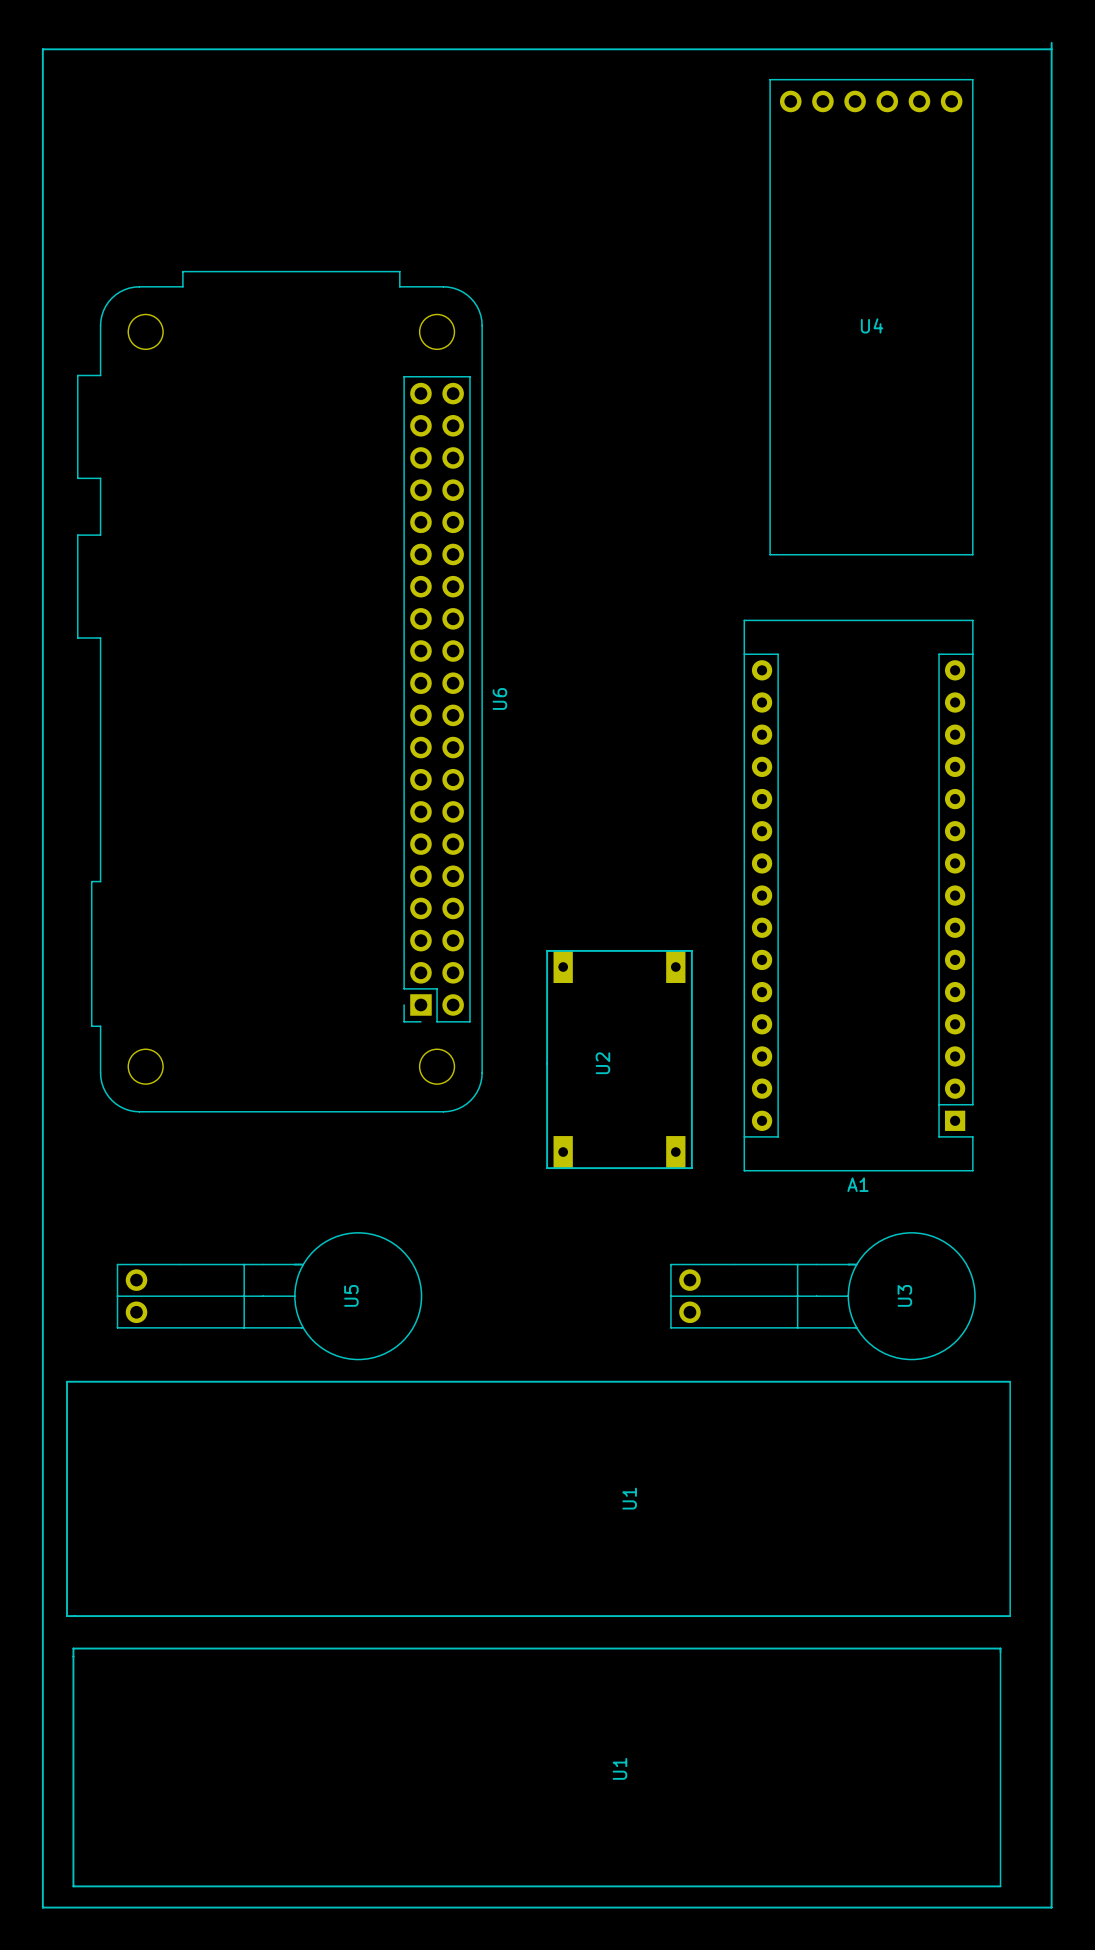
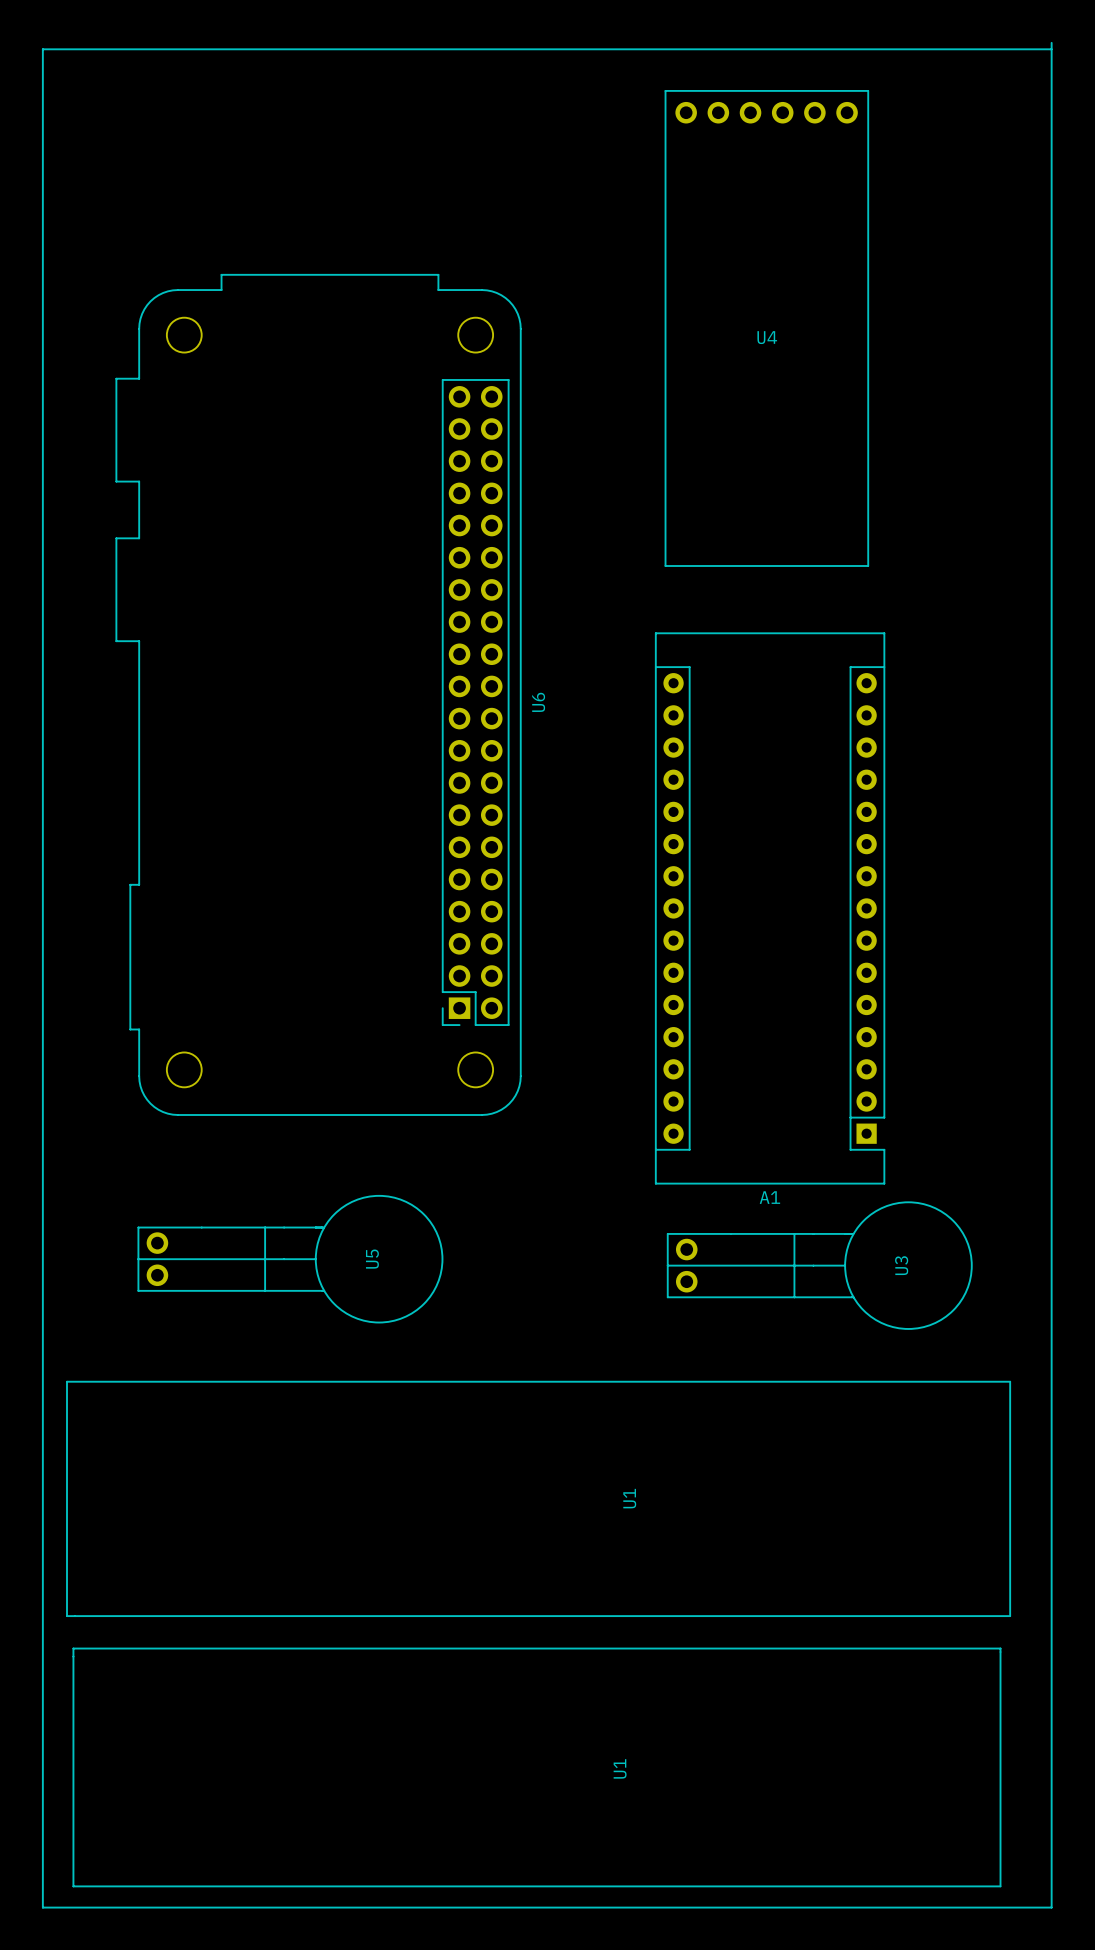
U4 position: (871, 317) -> (766, 328)
U6 position: (279, 691) -> (318, 694)
A1 position: (858, 895) -> (770, 908)
U2: (619, 1059) -> none
U5 position: (269, 1296) -> (290, 1259)
U3 position: (822, 1296) -> (819, 1265)

